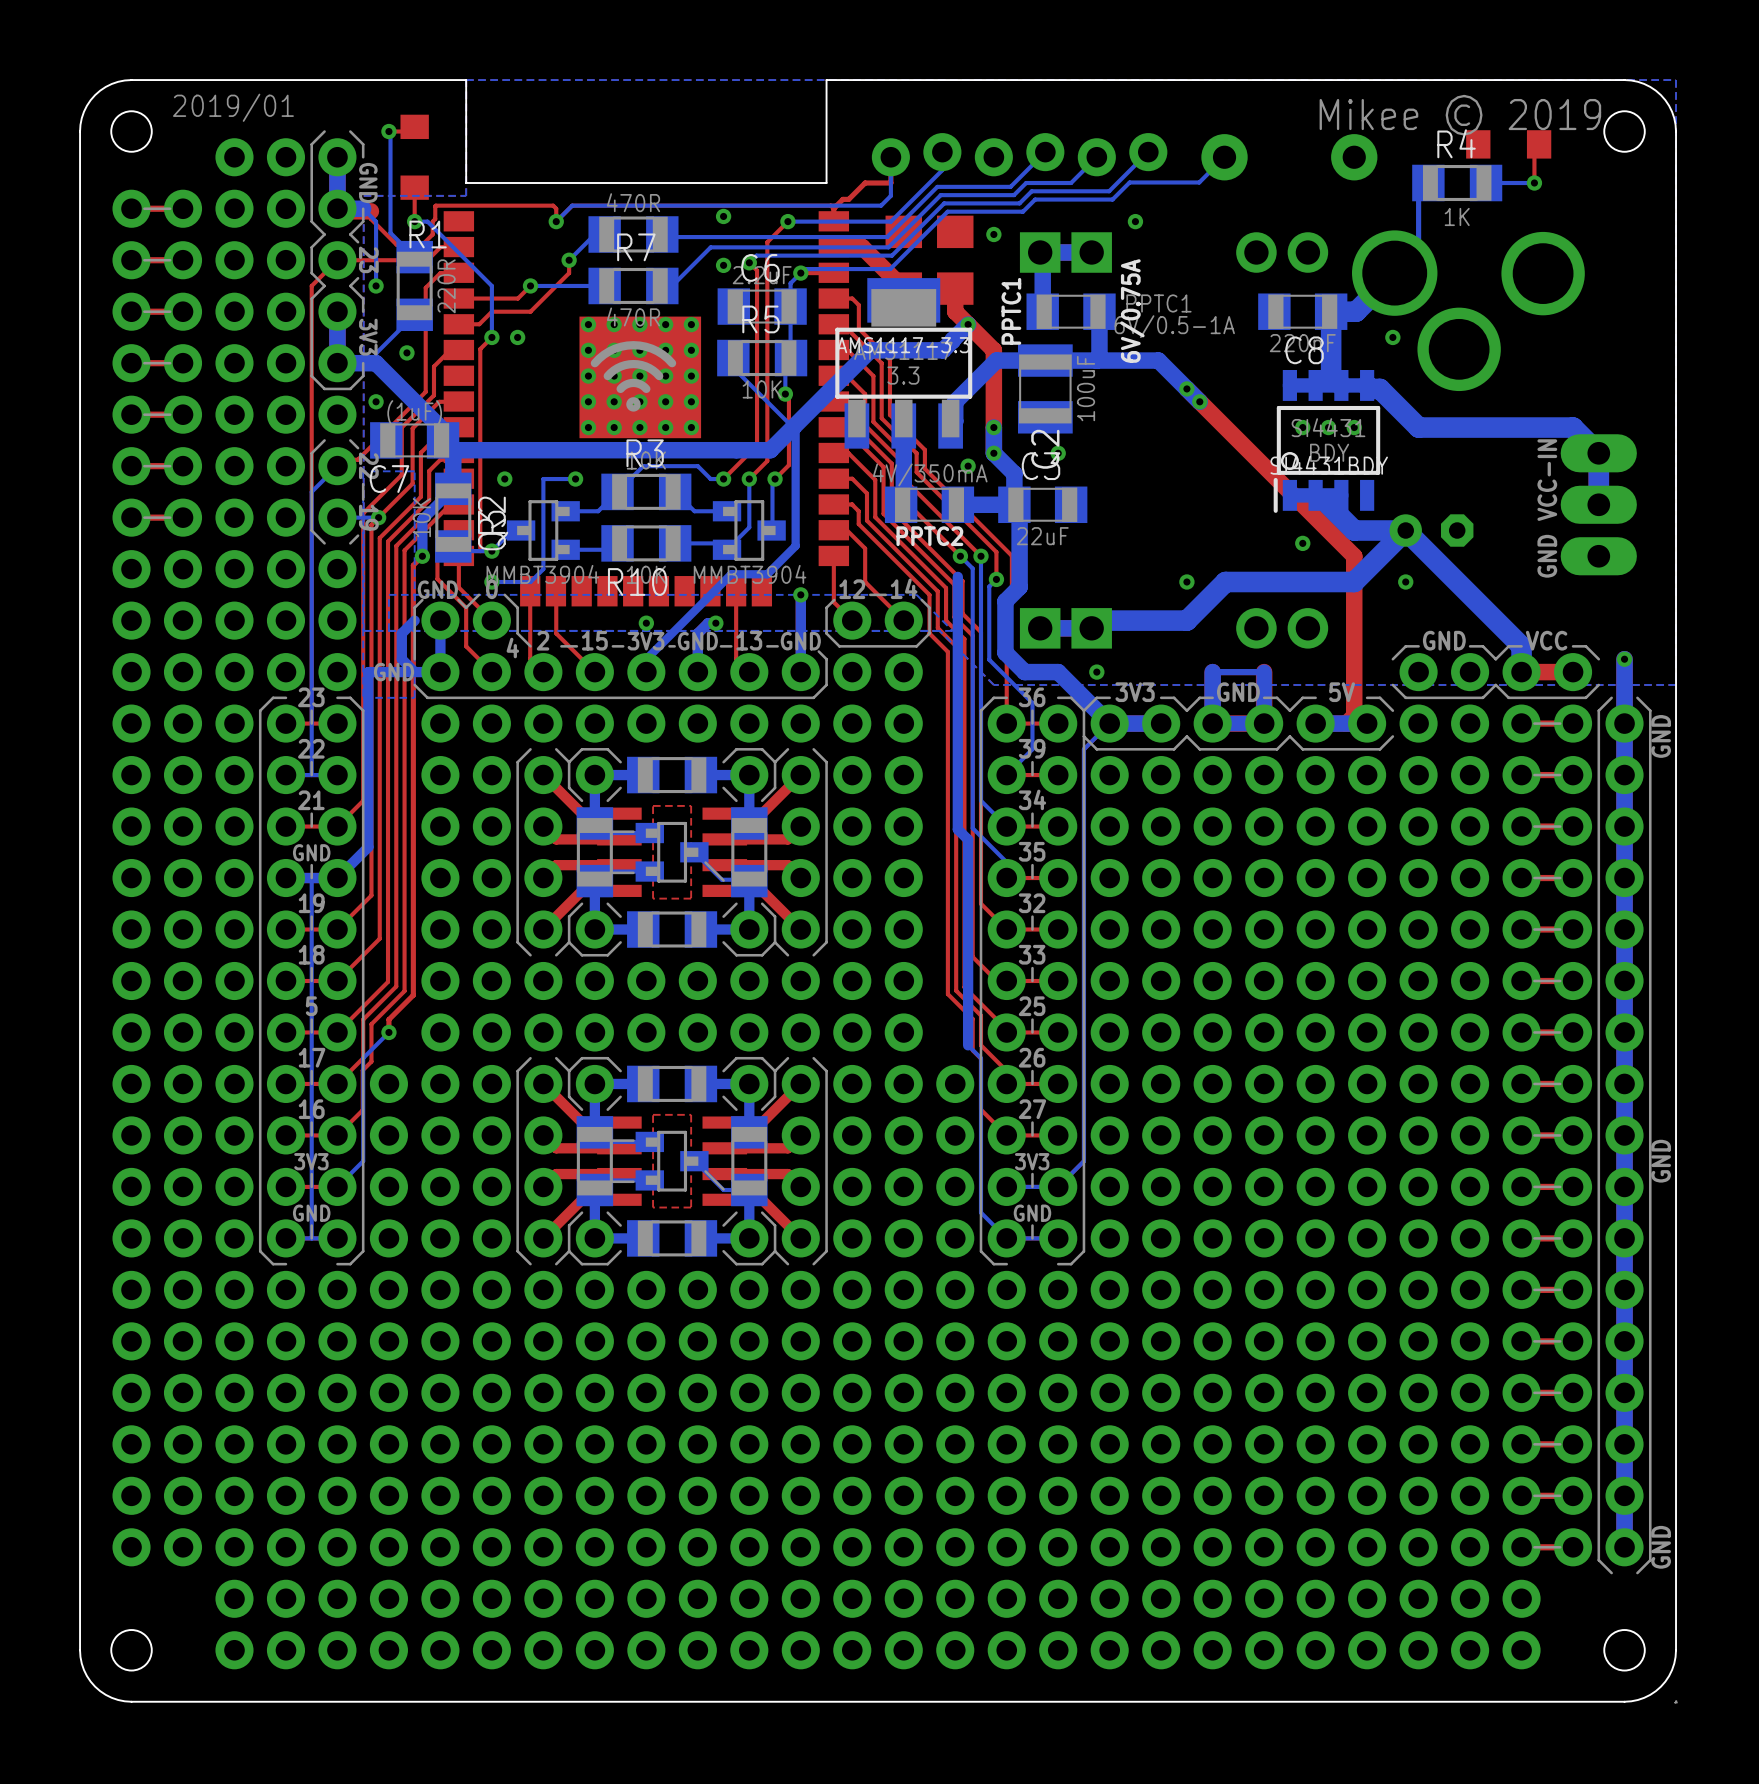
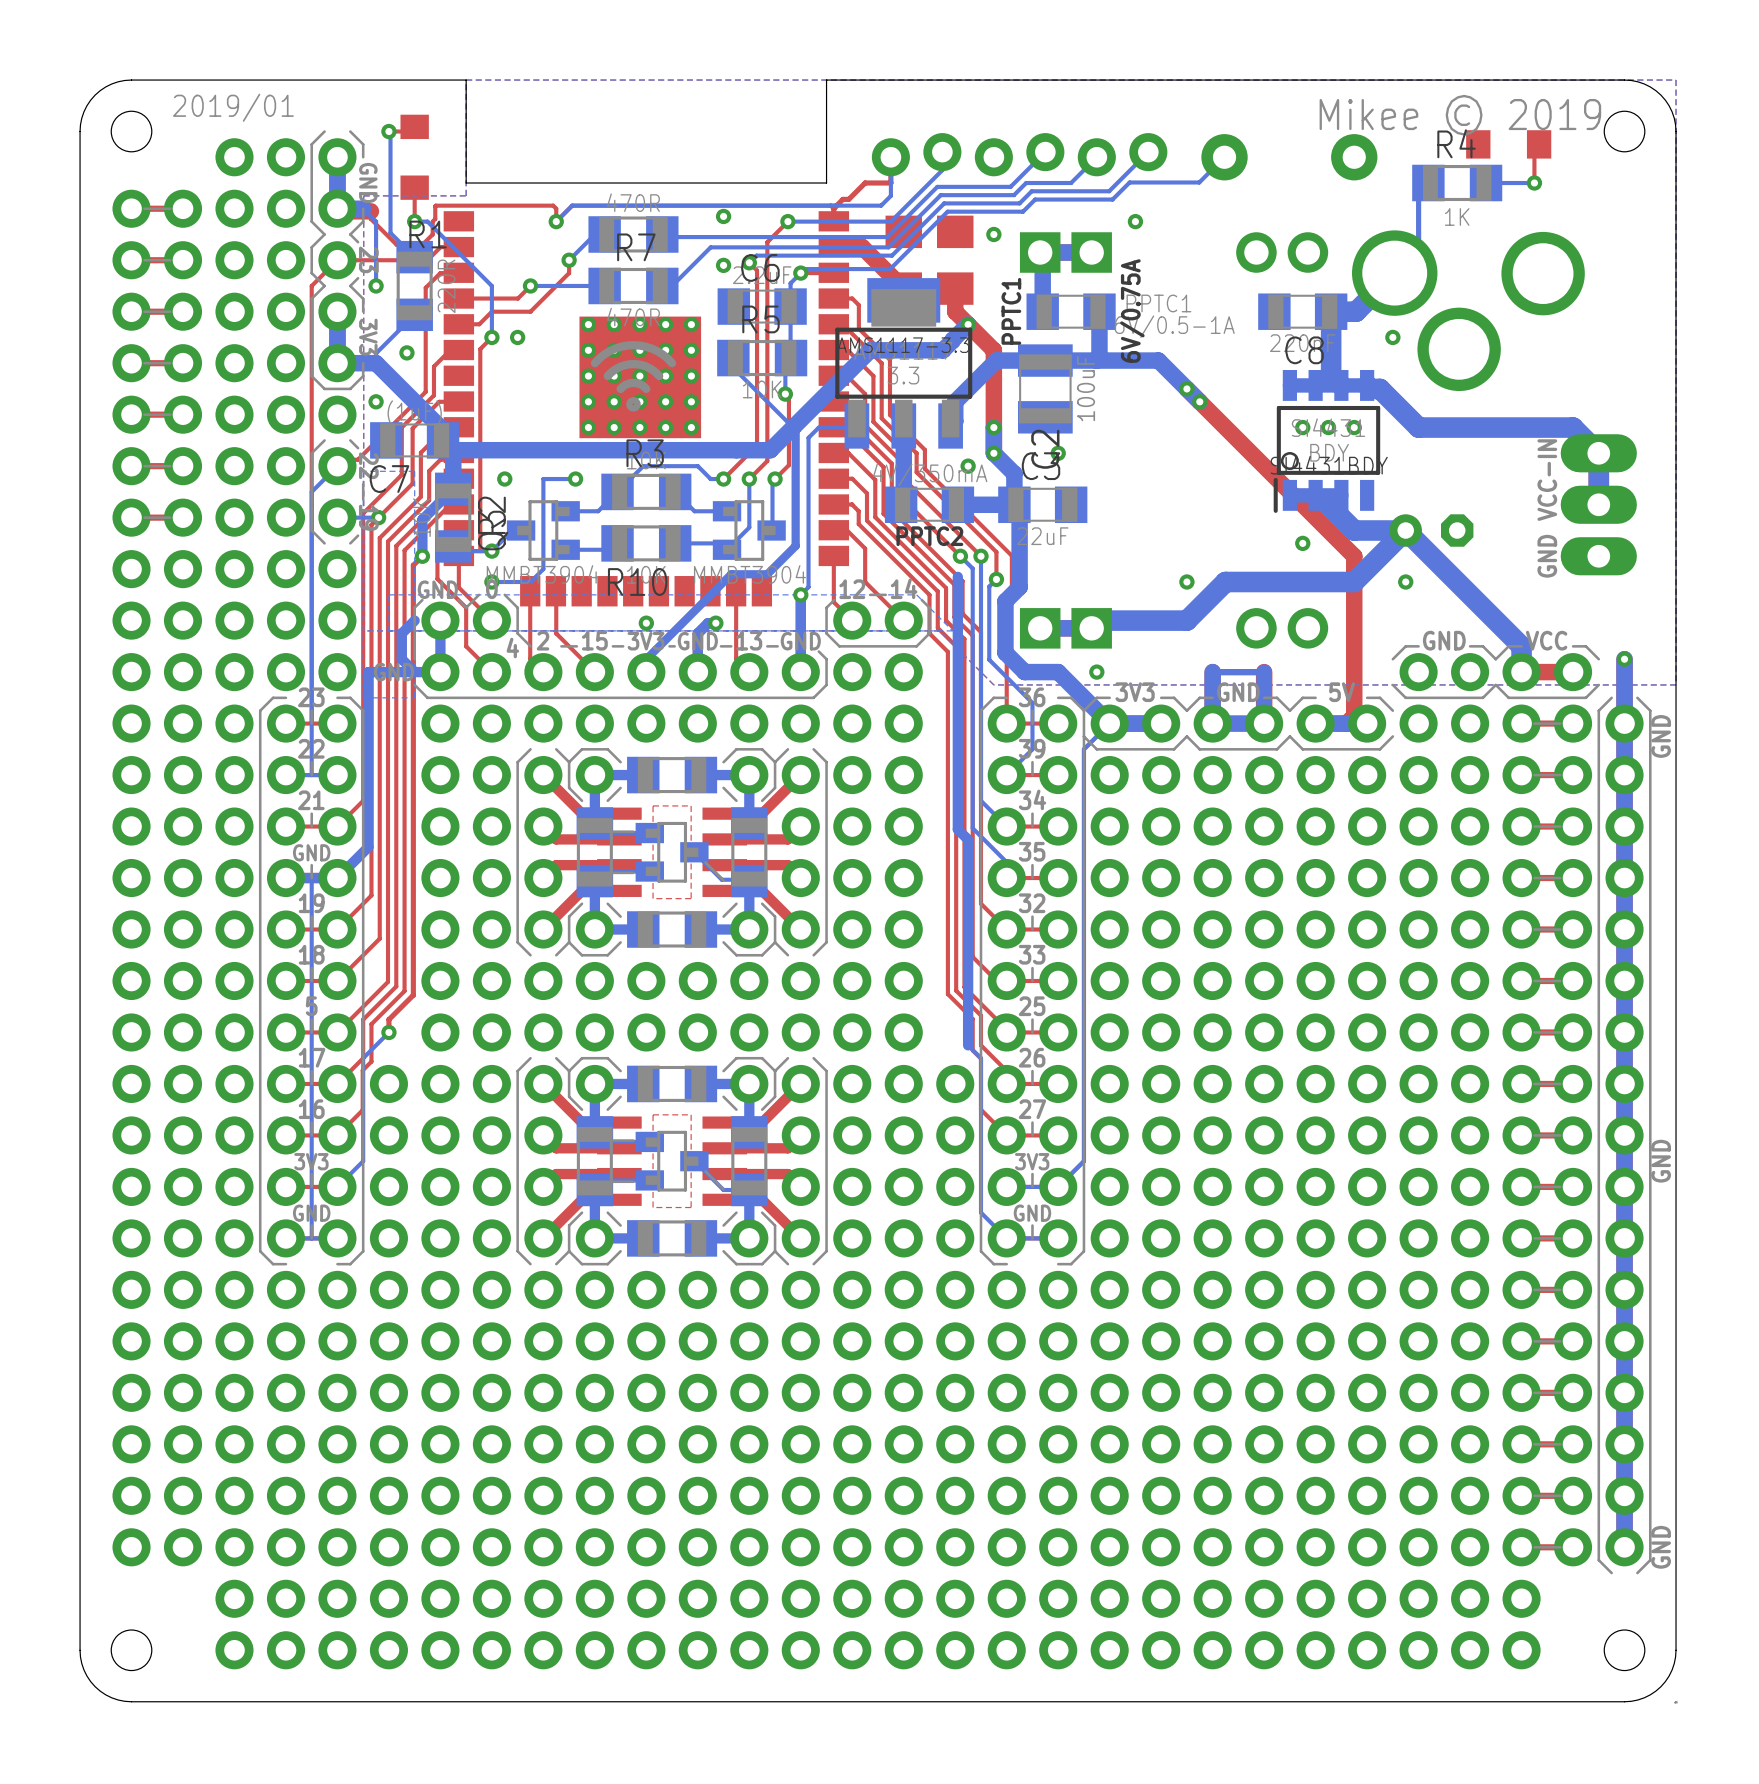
bottom track: none -> (856, 426) (856, 427) (818, 427) (808, 437) (808, 587) (800, 594)

